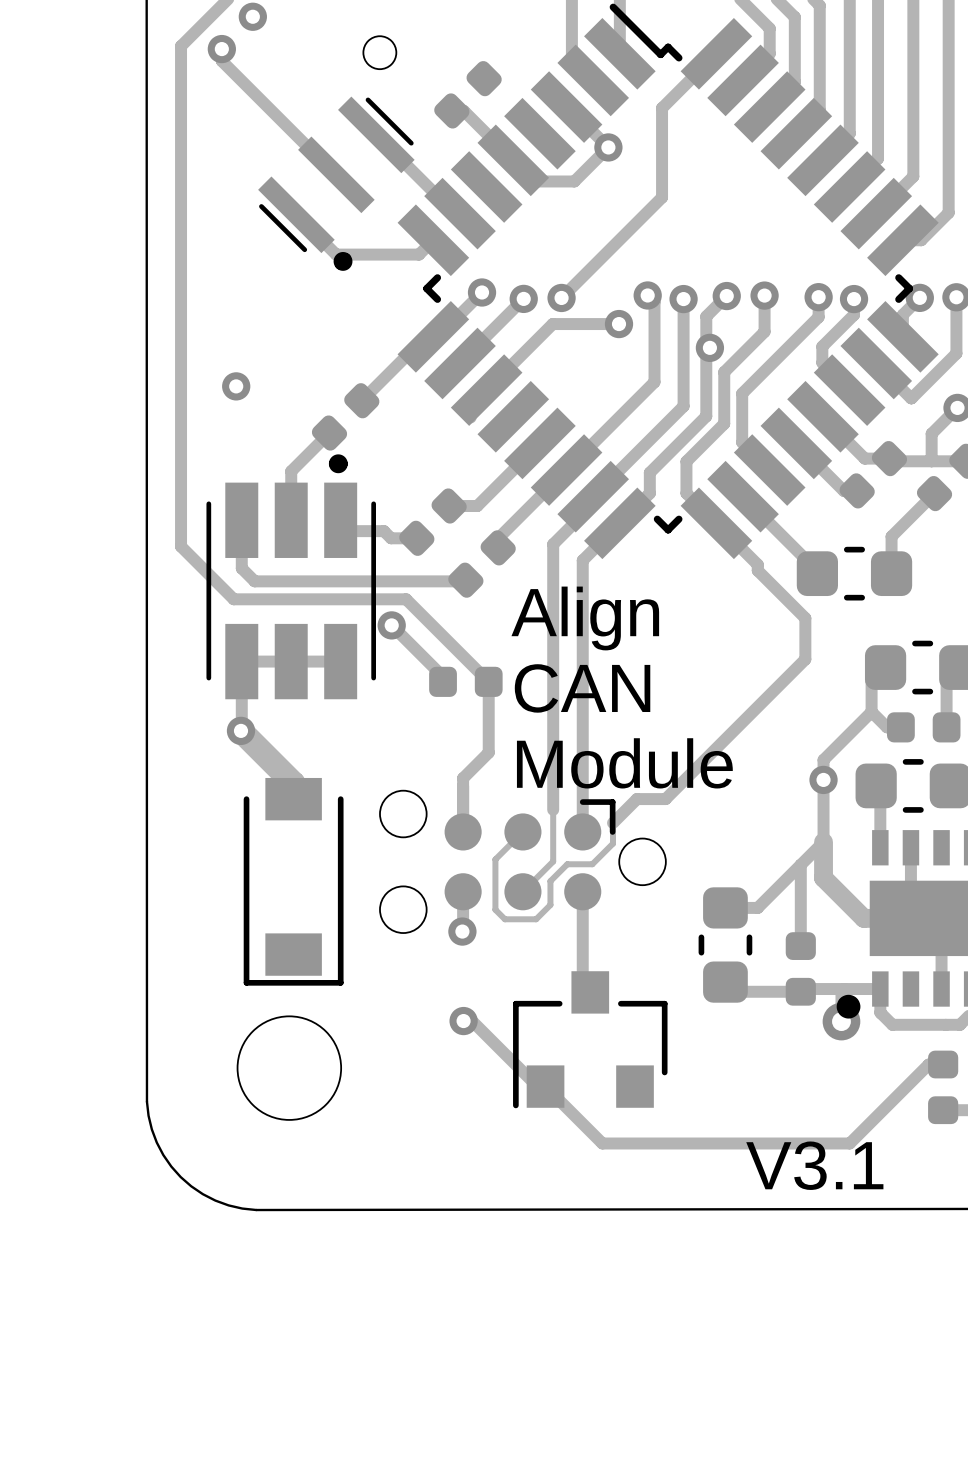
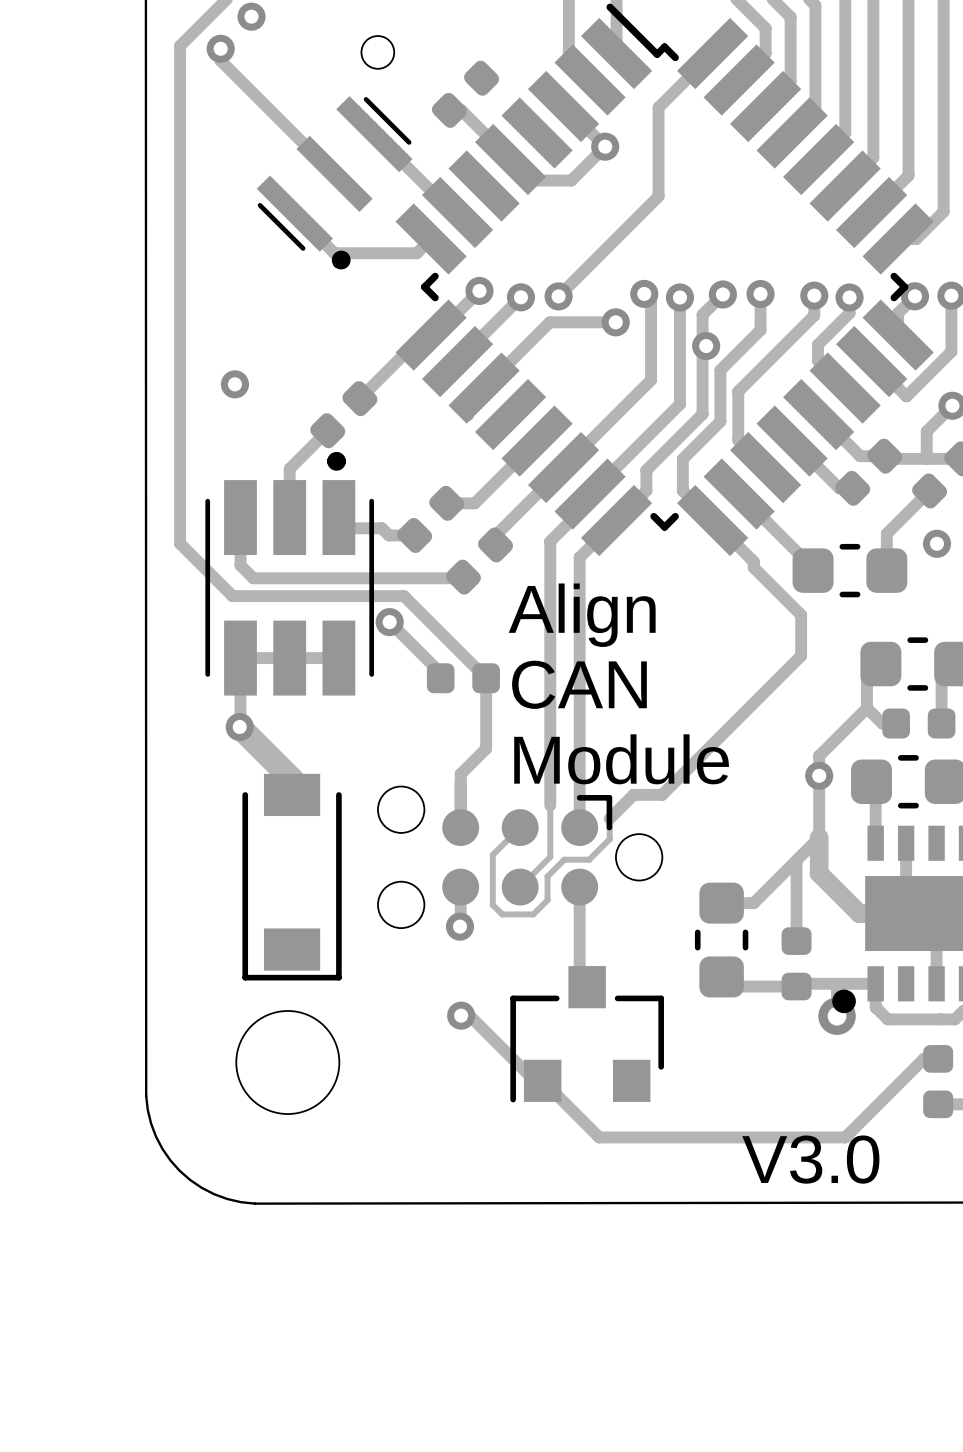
via: none -> (936, 543)
text: V3.1 (814, 1165) -> V3.0 (810, 1159)

